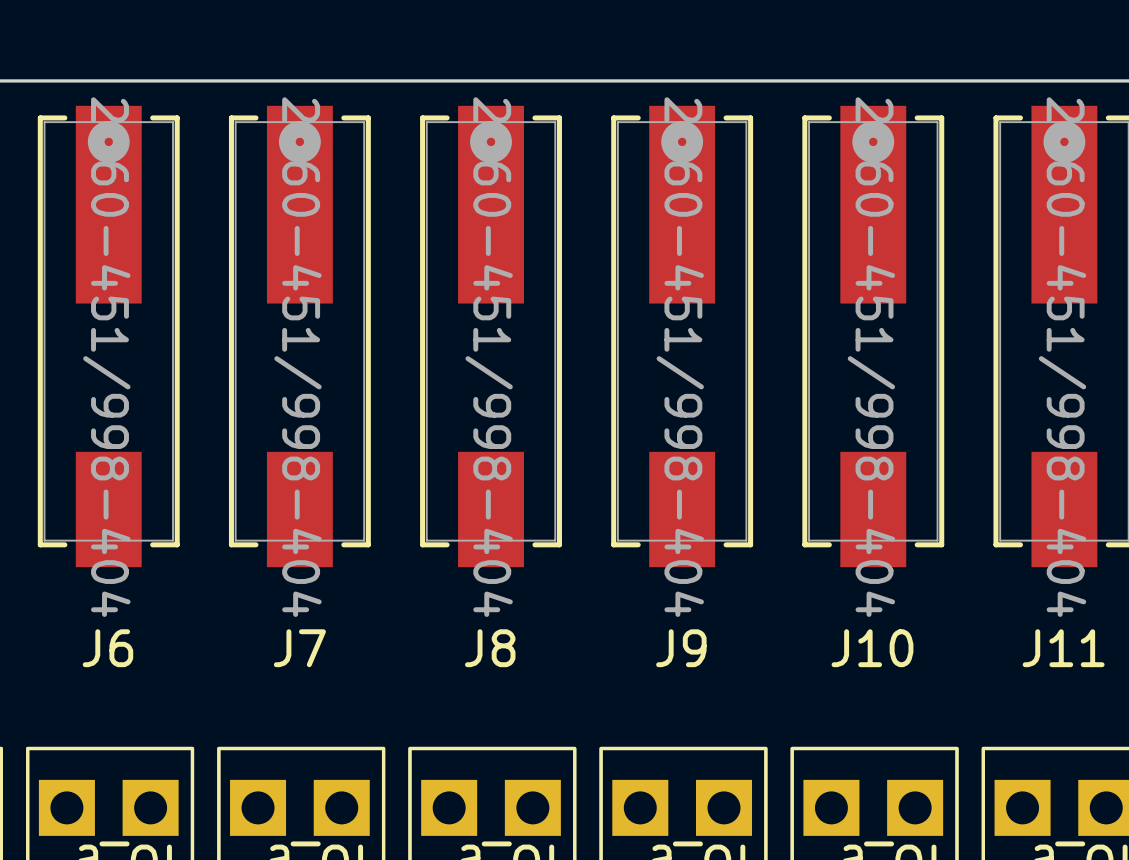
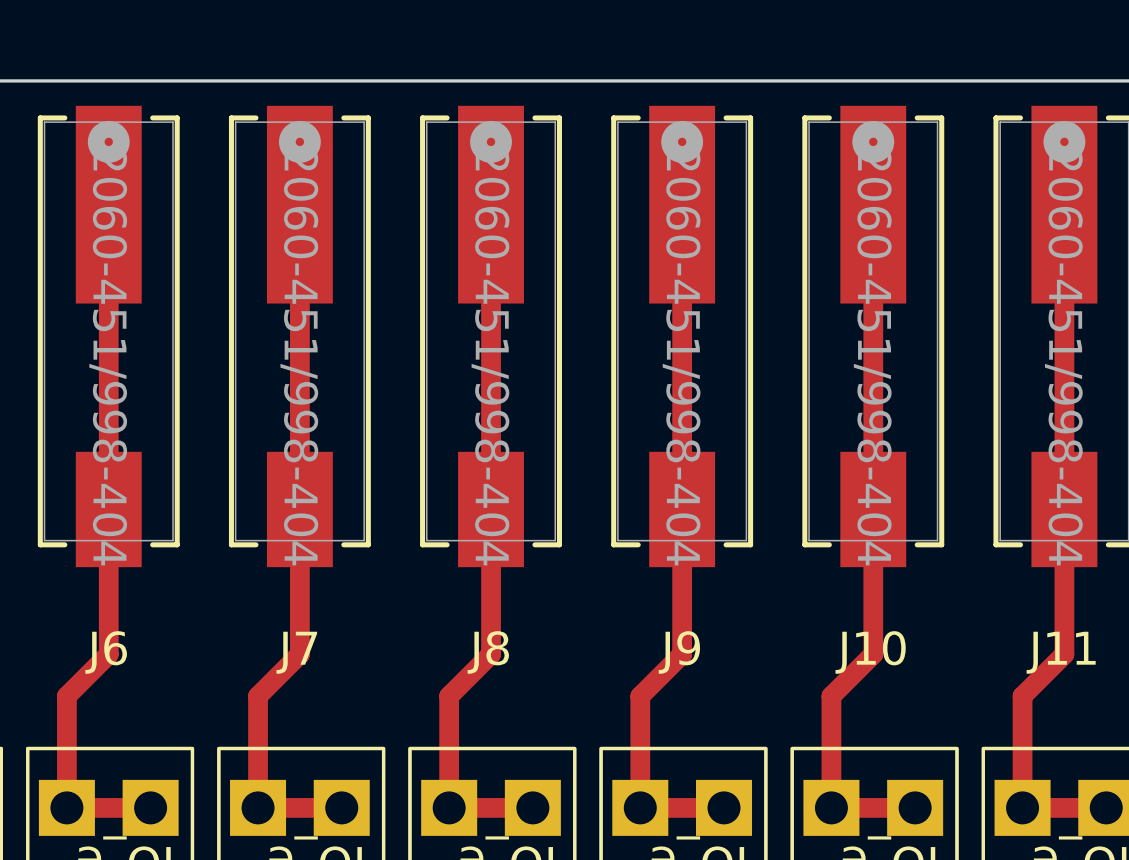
top track: none -> (108, 204) (108, 654) (66, 696) (66, 807) (150, 807)
top track: none -> (299, 204) (299, 654) (258, 696) (258, 807) (341, 807)
top track: none -> (491, 204) (491, 654) (449, 696) (449, 807) (532, 807)
top track: none -> (682, 204) (682, 654) (640, 696) (640, 807) (724, 807)
top track: none -> (873, 204) (873, 654) (831, 696) (831, 807) (915, 807)
top track: none -> (1064, 204) (1064, 654) (1022, 696) (1022, 807) (1106, 807)

